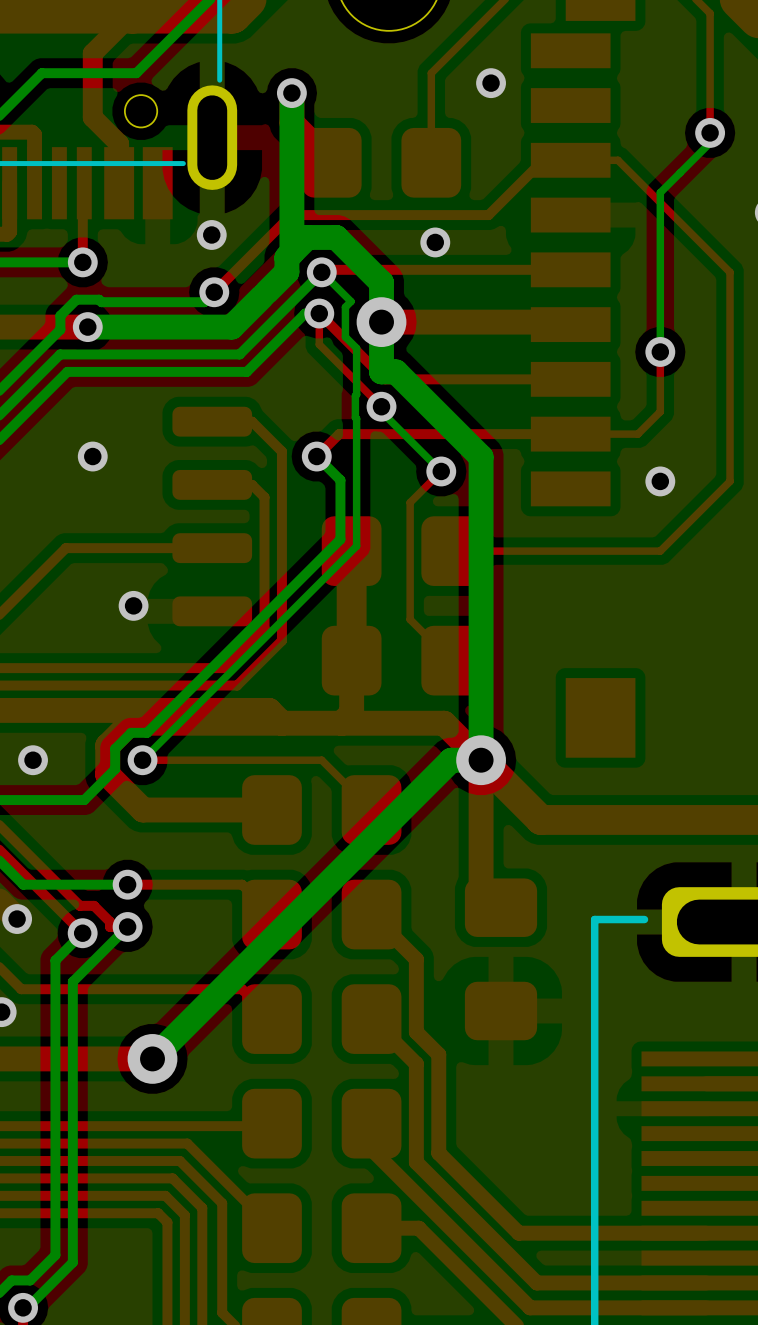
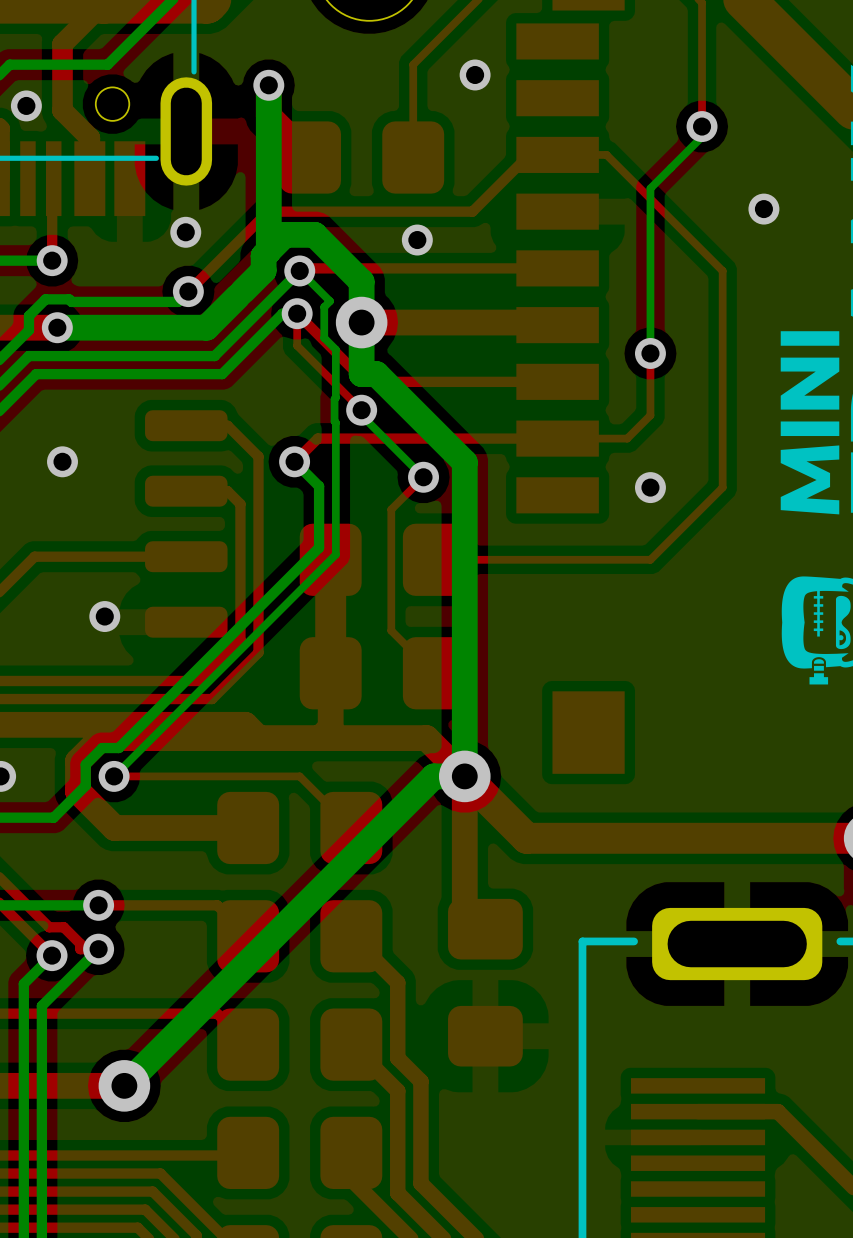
via: none -> (26, 105)

